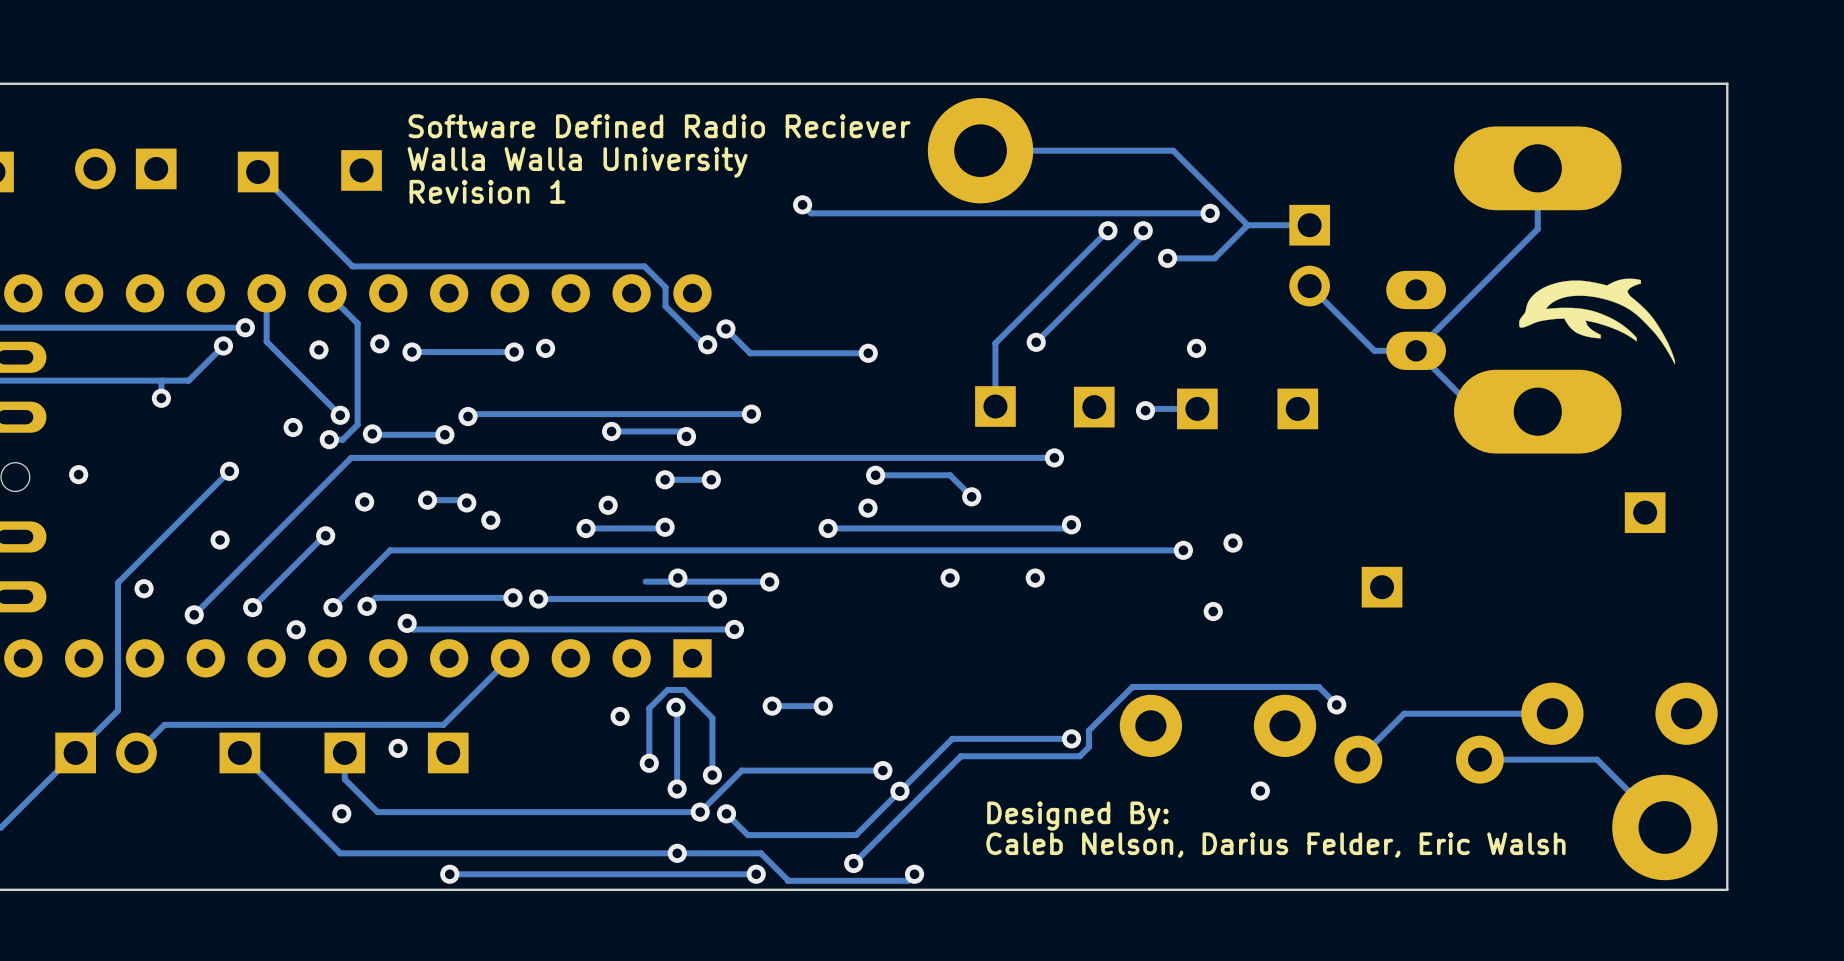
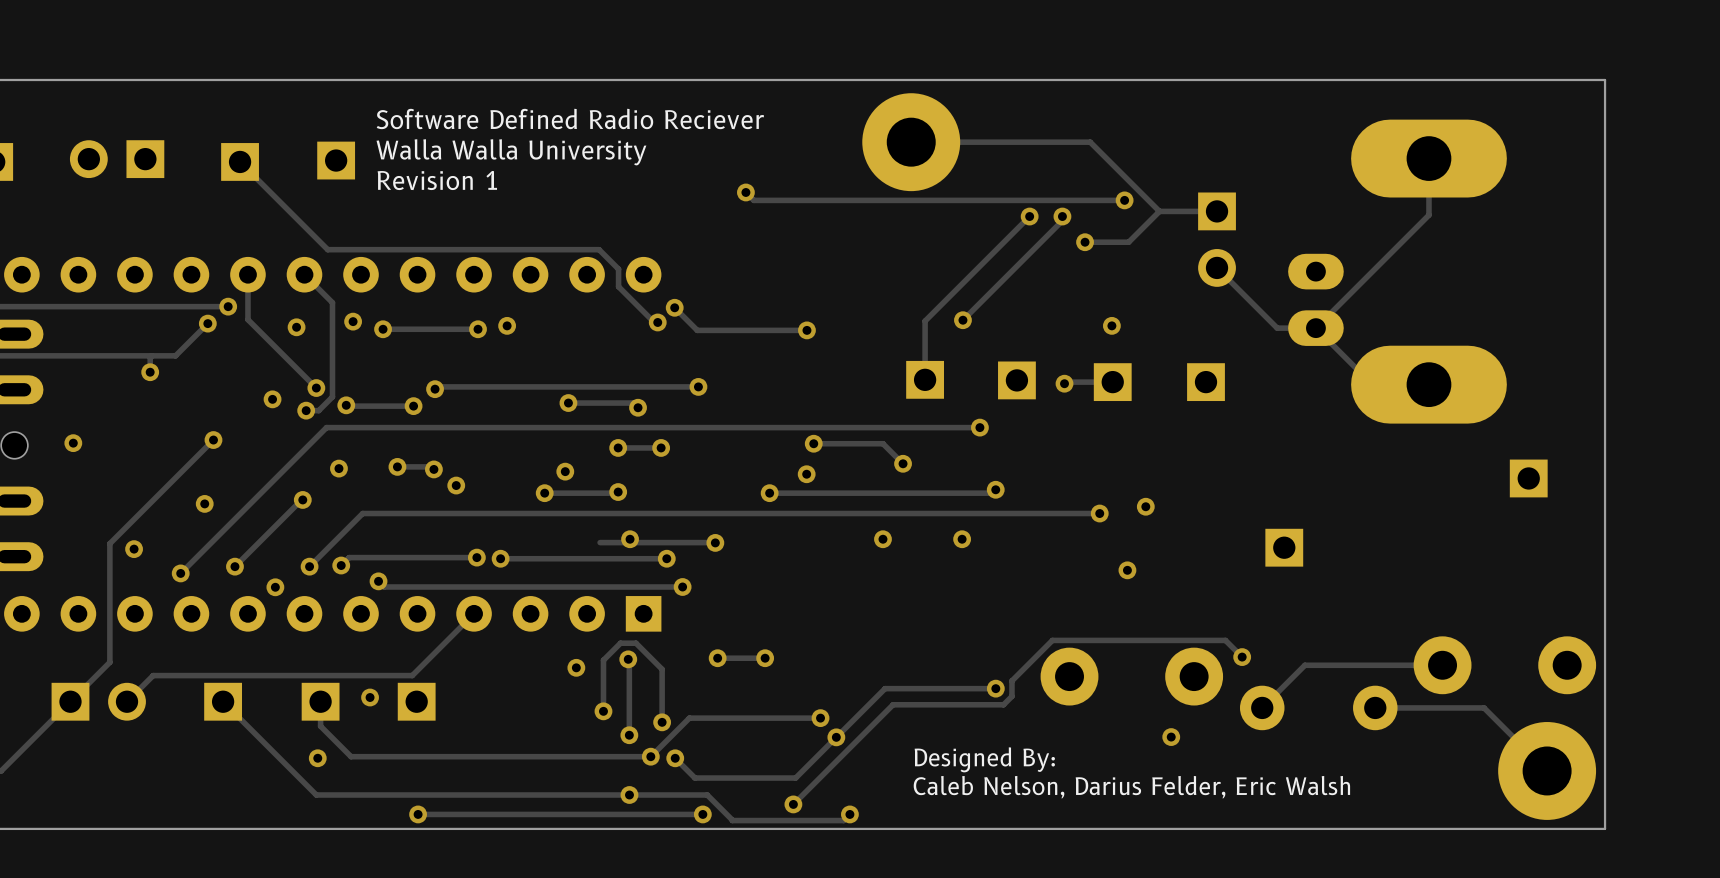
drawing: [1519, 278, 1676, 365] -> none

